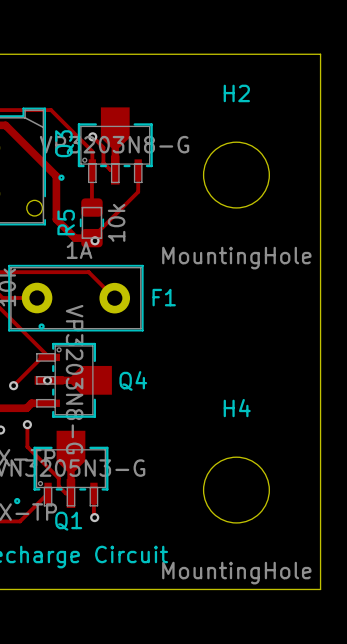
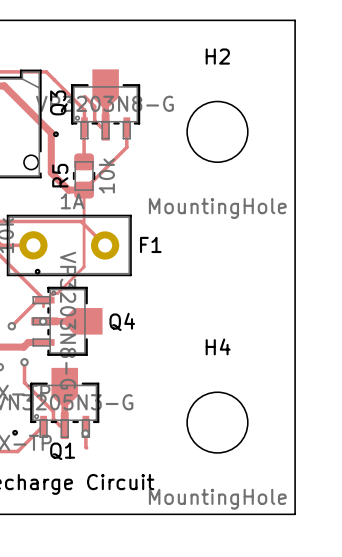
via: (92, 136) -> none
track: none -> (84, 190) (84, 266) (57, 293) (53, 293) (43, 302) (43, 306)
via: (95, 240) -> none
via position: (94, 517) -> (85, 433)

